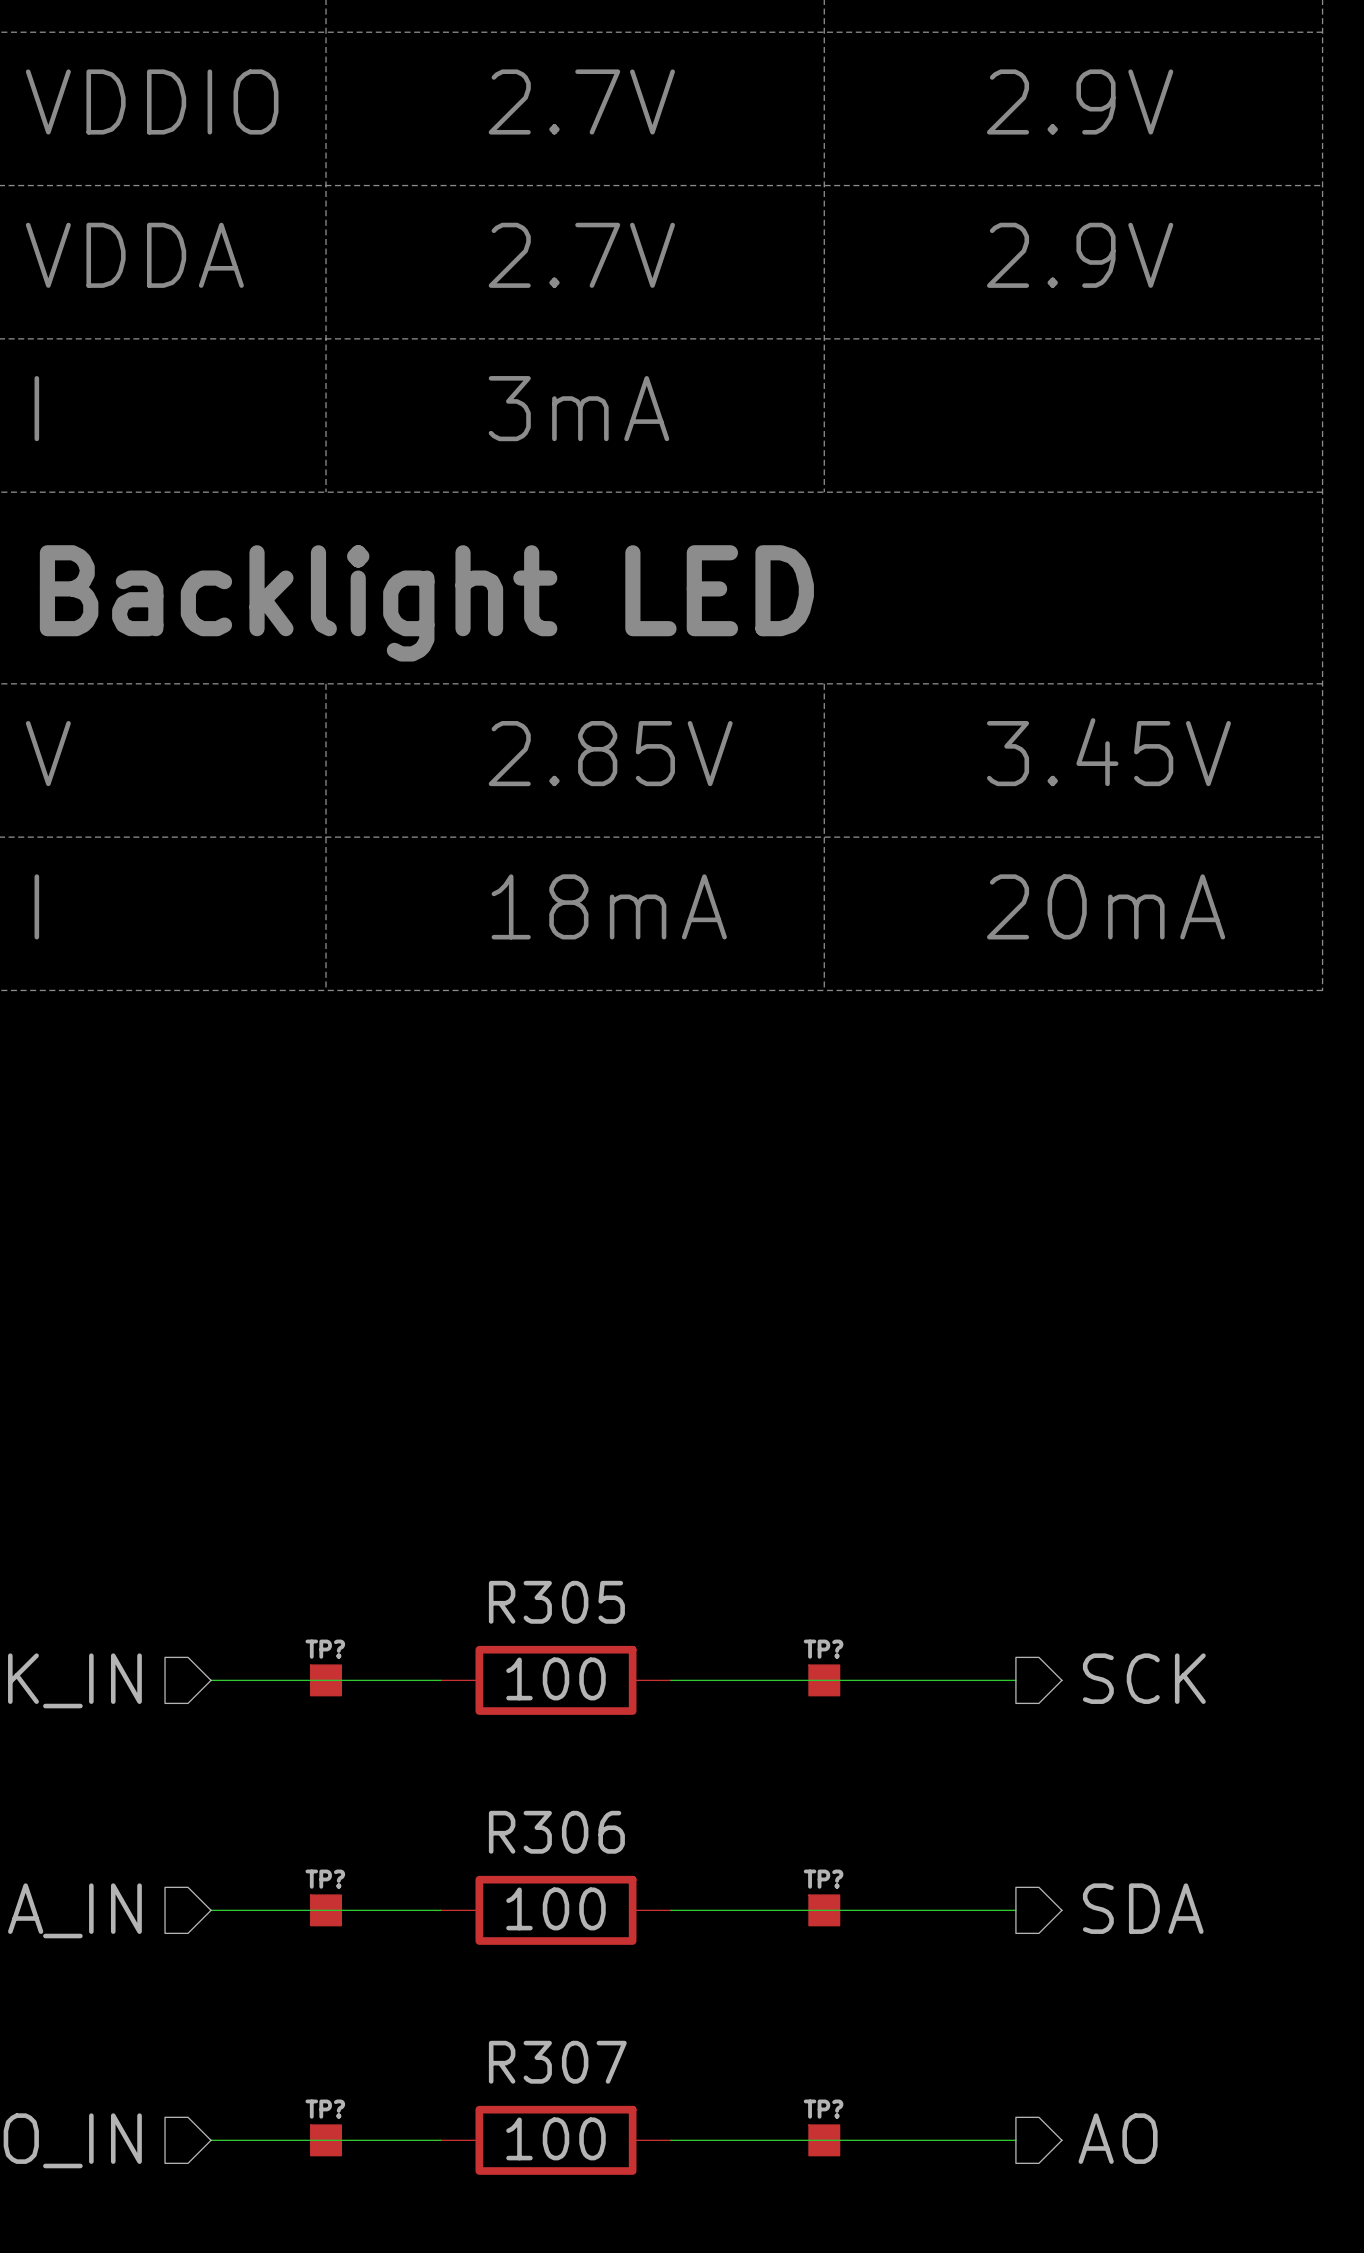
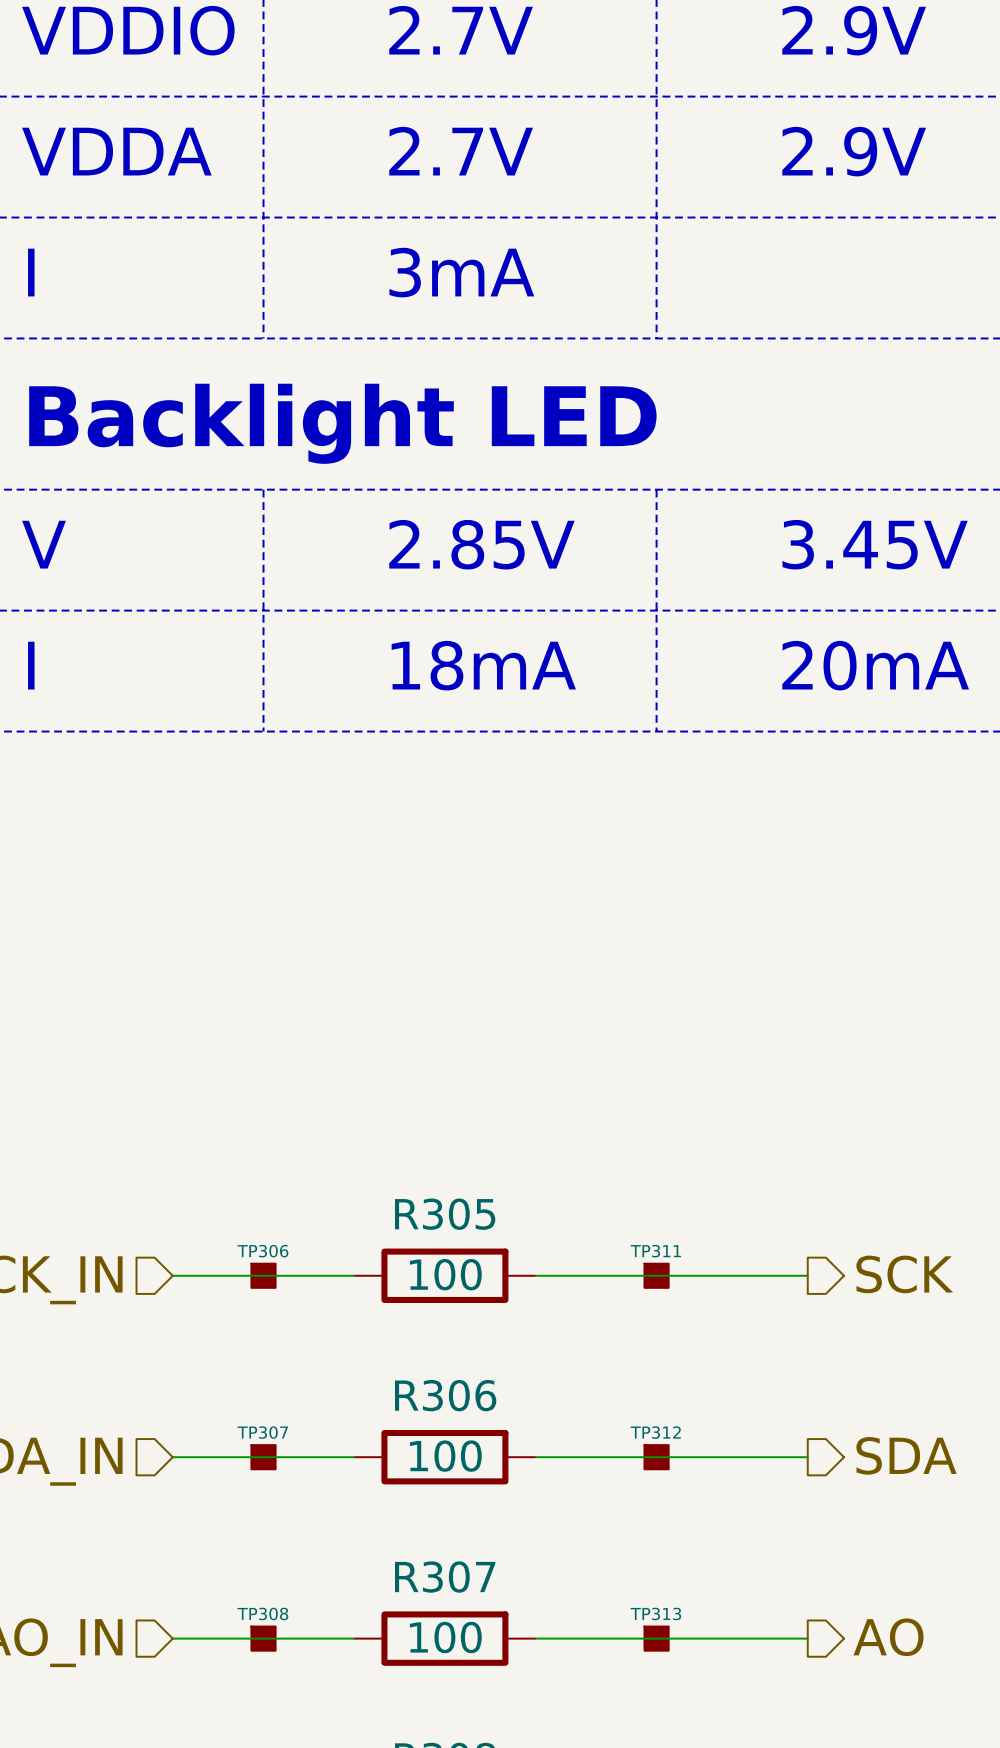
TP? name: TP? (325, 1649) -> TP306 (262, 1251)
TP? name: TP? (823, 1649) -> TP311 (655, 1251)
TP? name: TP? (325, 1879) -> TP307 (262, 1432)
TP? name: TP? (823, 1879) -> TP312 (655, 1432)
TP? name: TP? (325, 2109) -> TP308 (262, 1613)
TP? name: TP? (823, 2109) -> TP313 (655, 1613)

